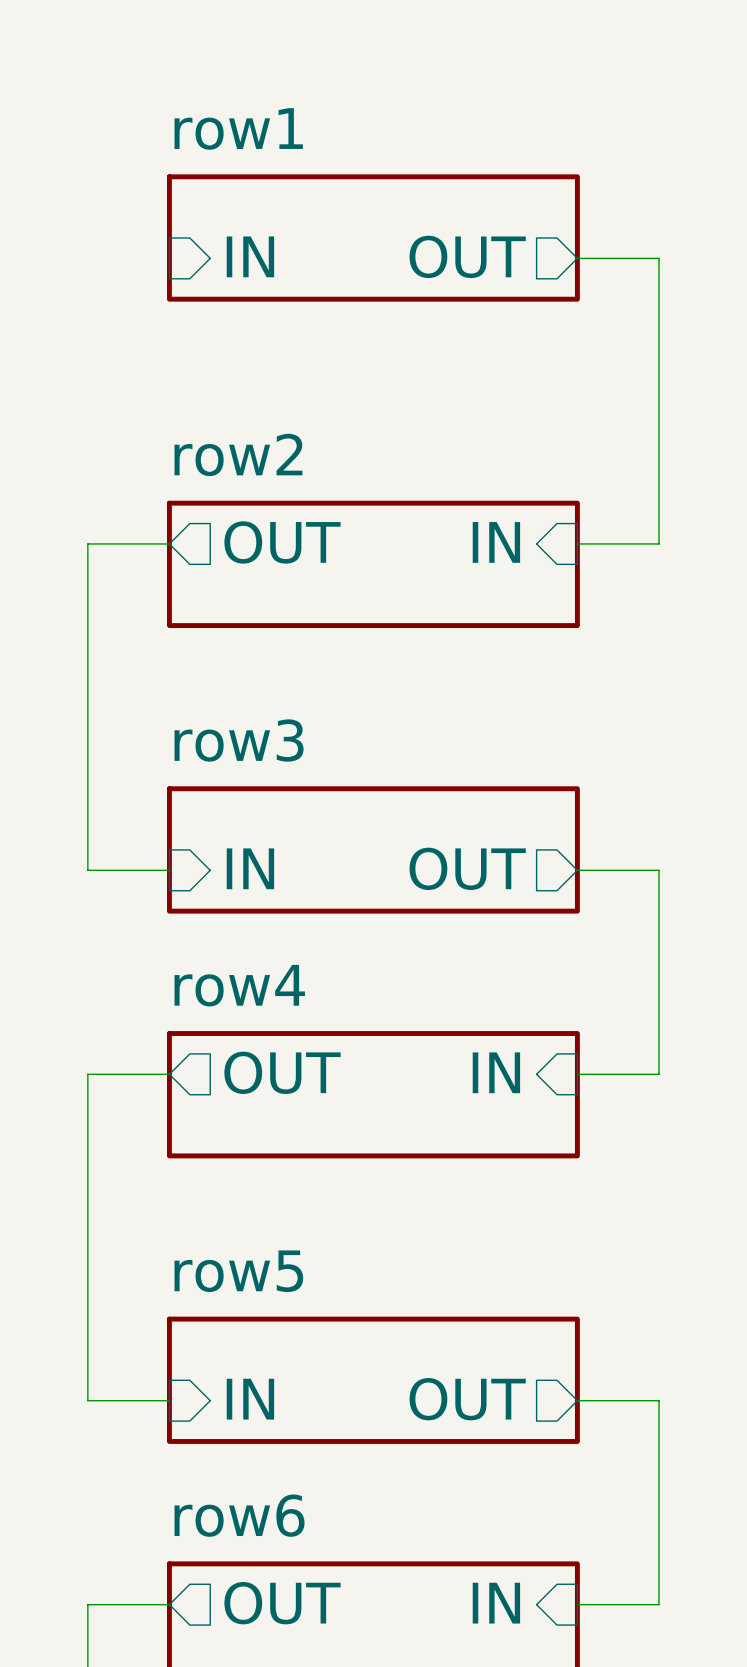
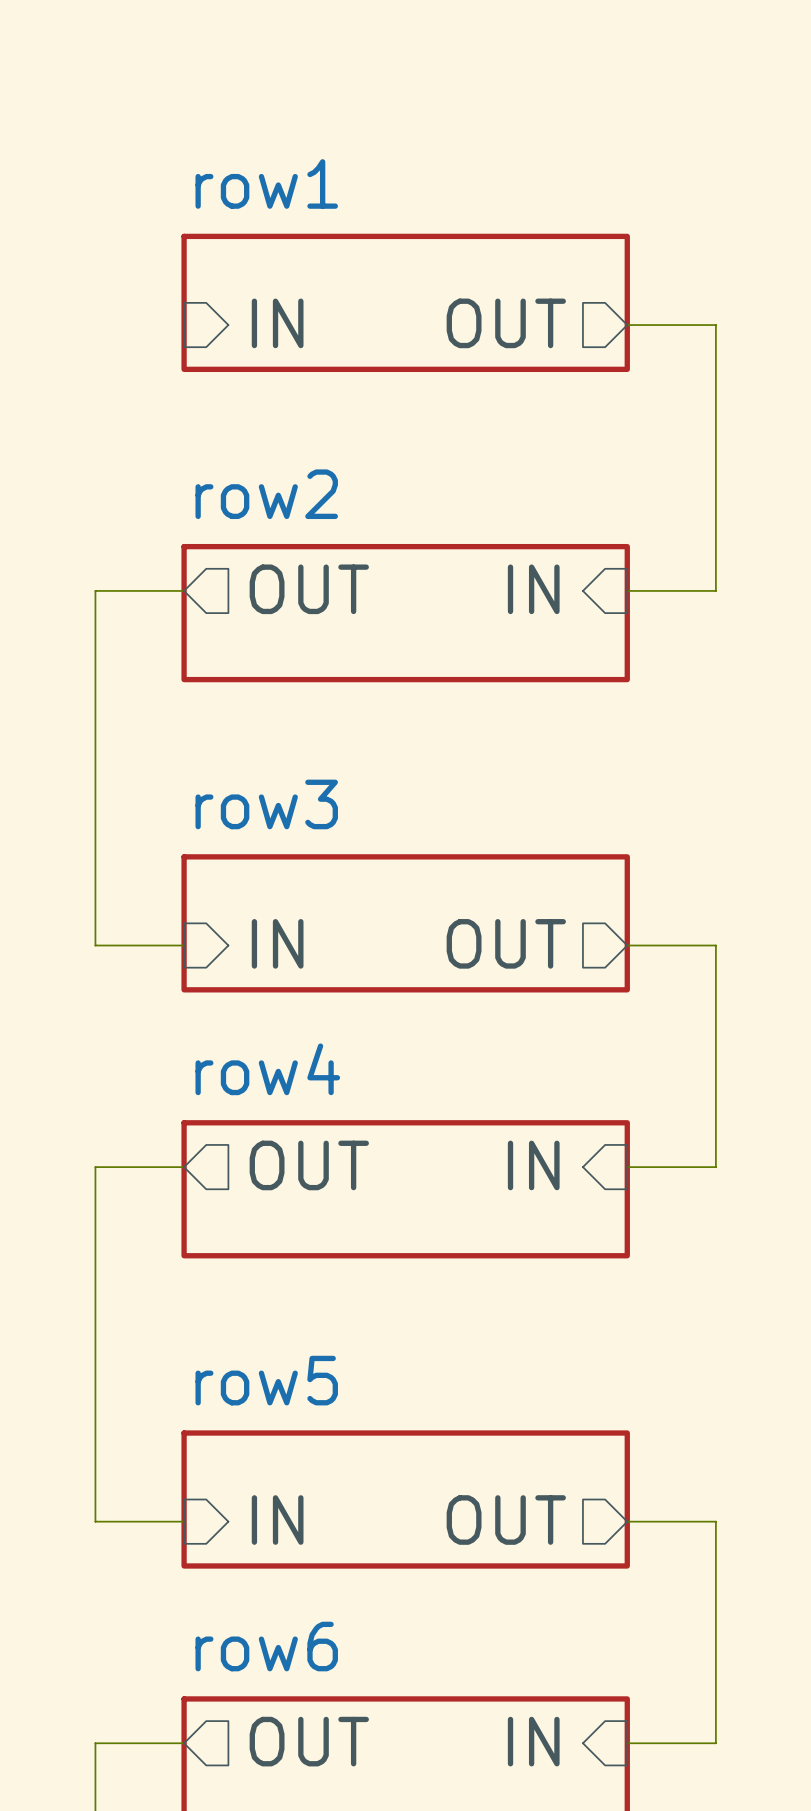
sheet row1 position: (373, 237) -> (405, 302)
sheet pin position: IN (250, 256) -> IN (277, 323)
sheet pin position: OUT (467, 256) -> OUT (506, 323)
wire: (577, 258) (659, 258) (659, 299) -> (627, 325) (715, 325)

